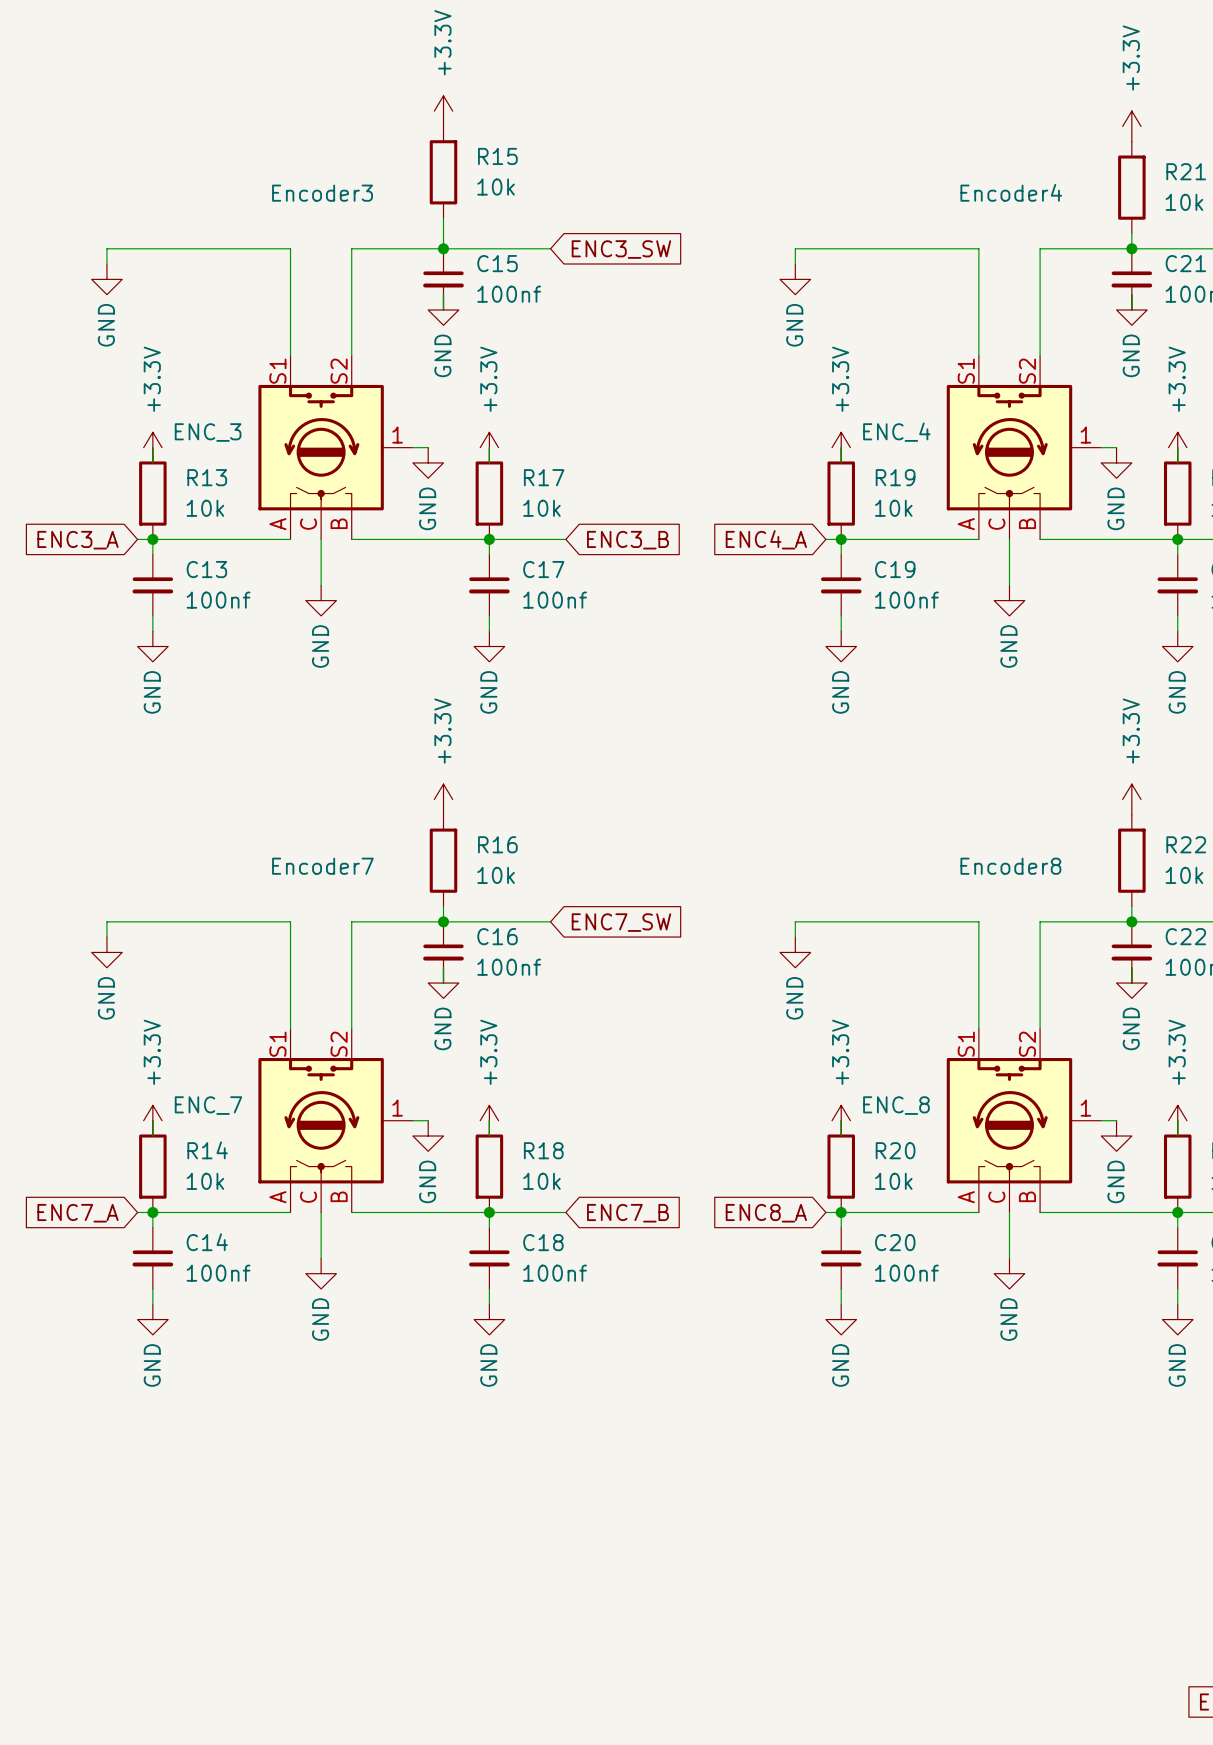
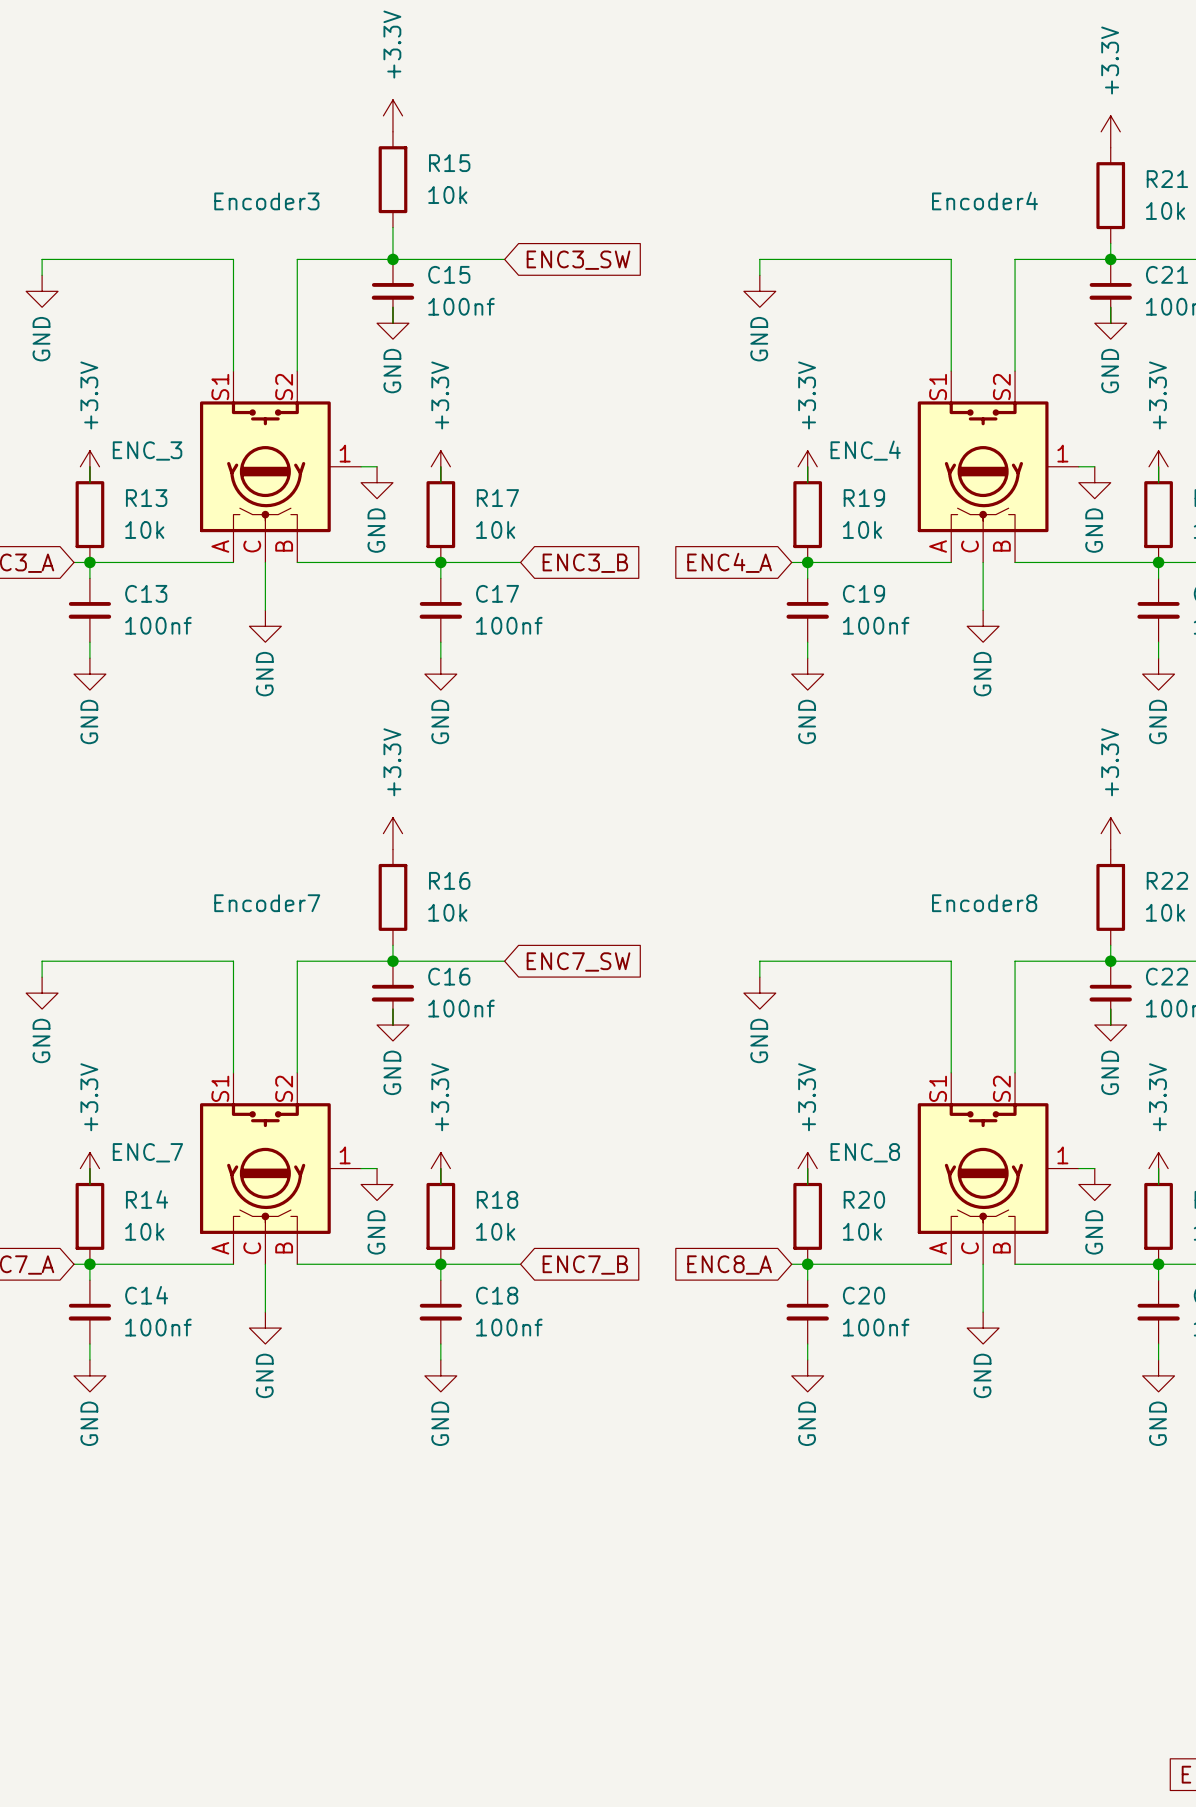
ENC_3 symbol: [258, 355, 413, 540] -> [199, 371, 362, 563]
ENC_4 symbol: [946, 355, 1102, 540] -> [917, 371, 1079, 563]
ENC_7 symbol: [258, 1028, 413, 1213] -> [199, 1072, 362, 1265]
ENC_8 symbol: [946, 1028, 1102, 1213] -> [917, 1072, 1079, 1265]

